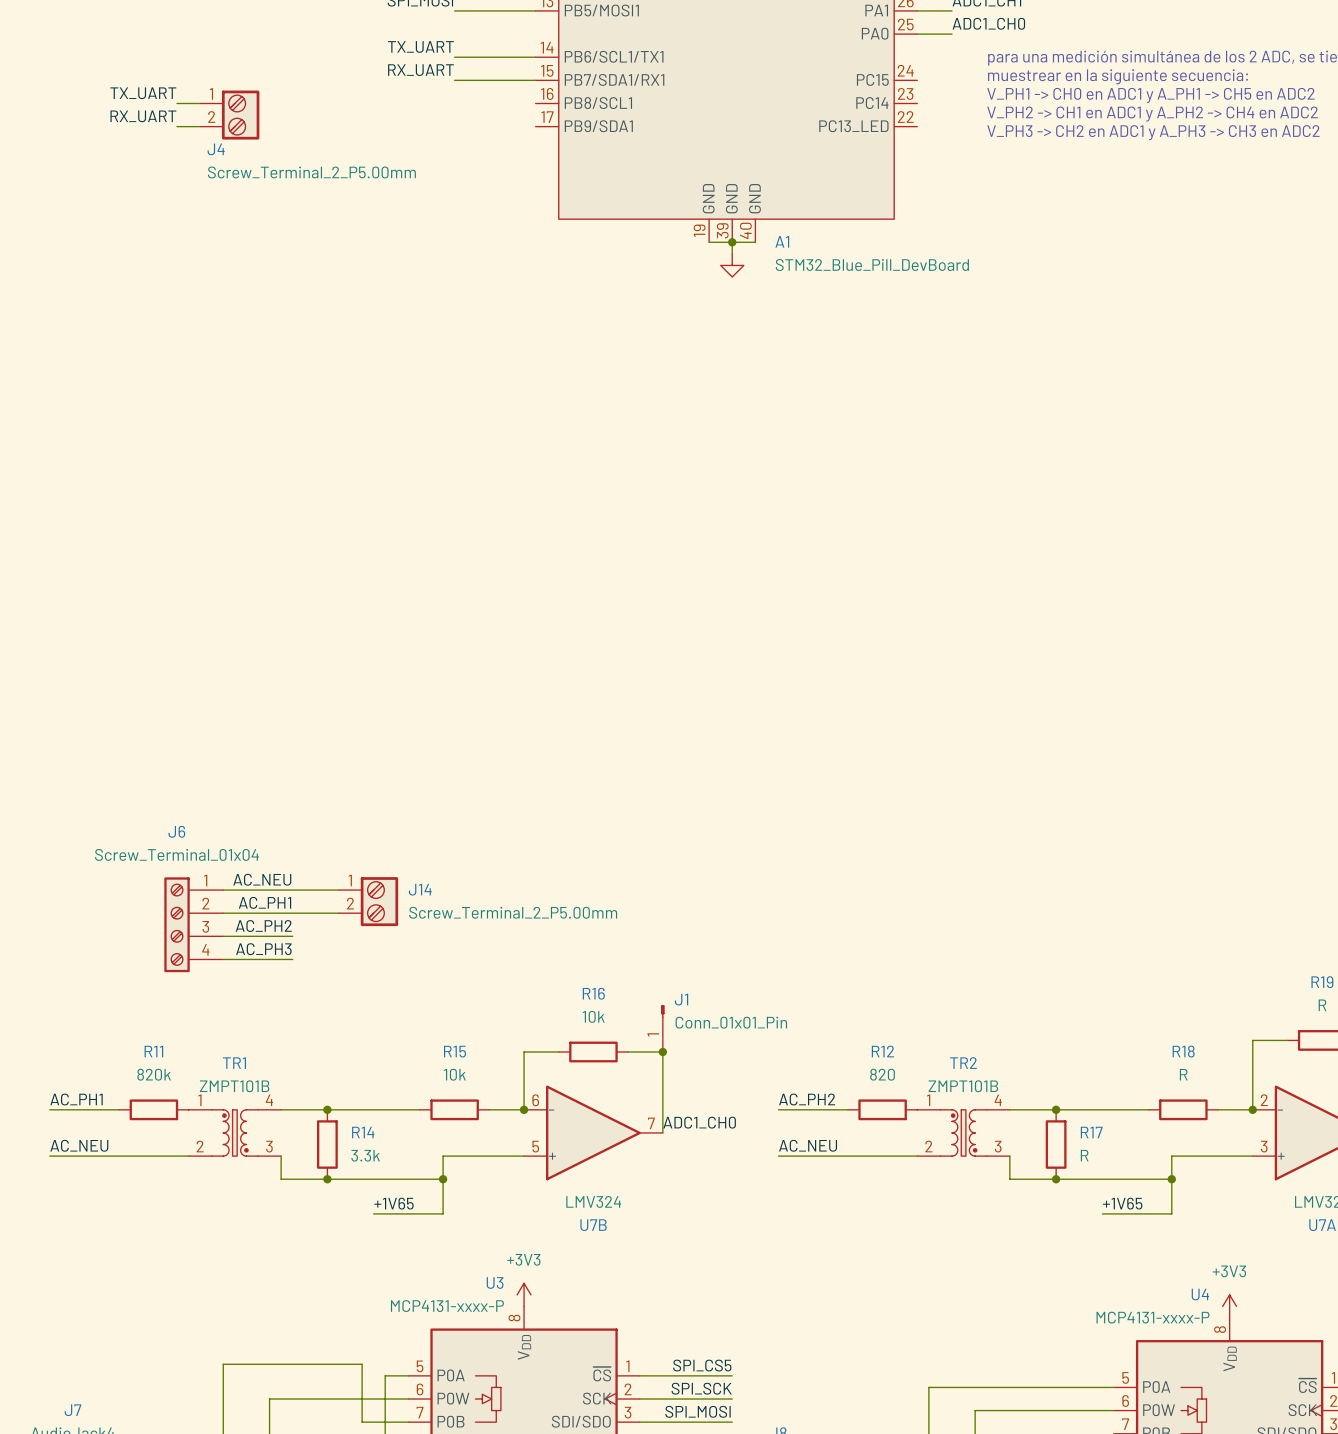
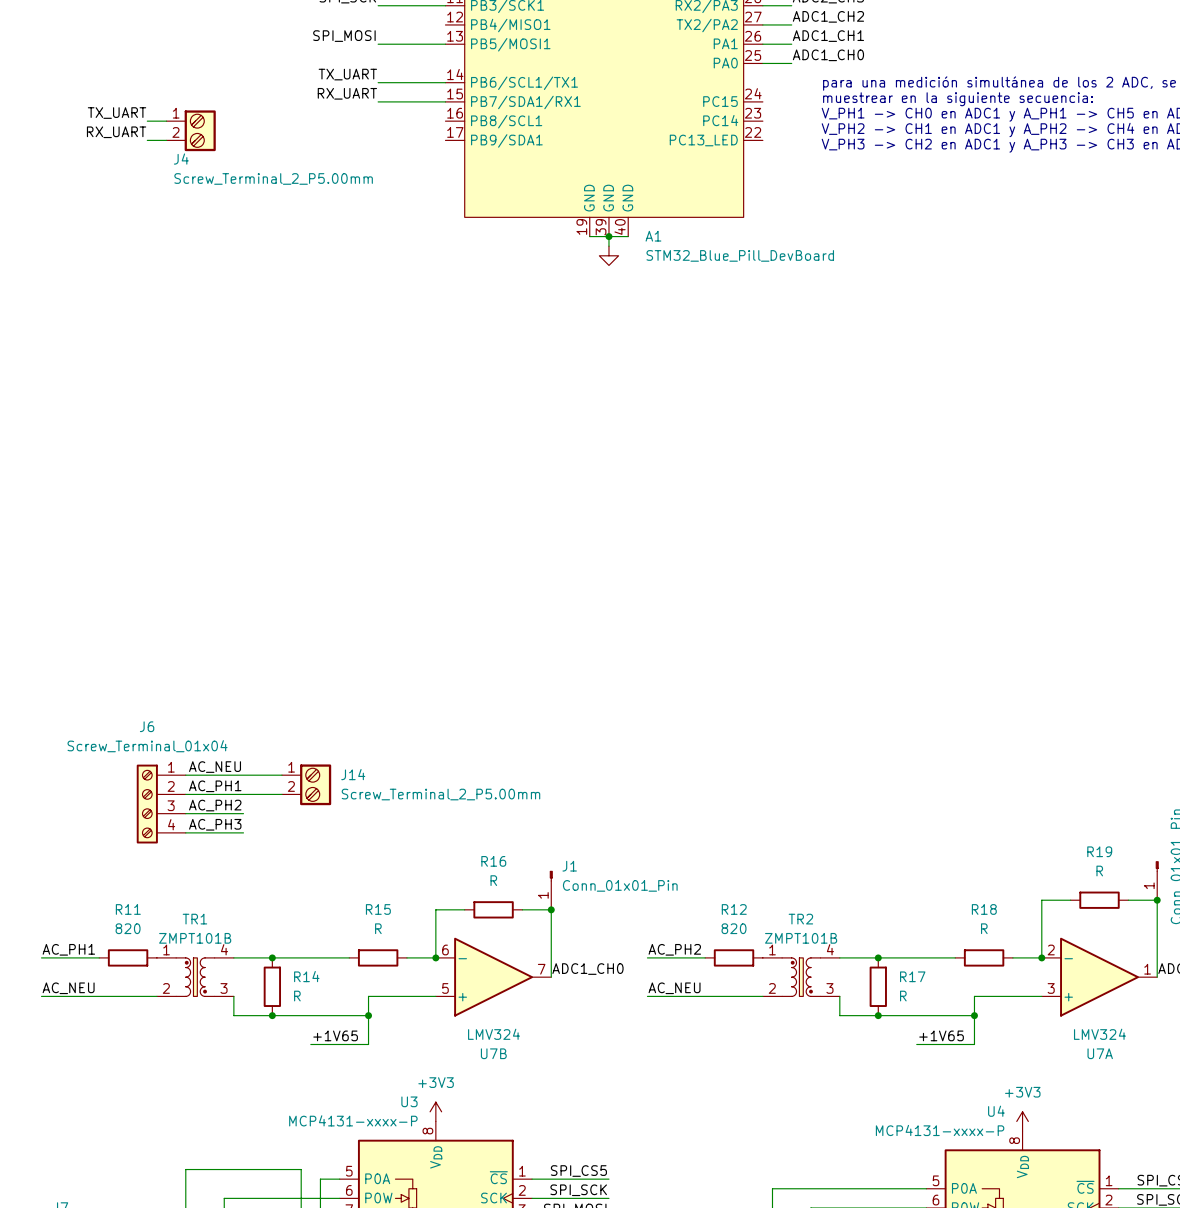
R16 value: 10k (593, 1016) -> R (493, 880)
R11 value: 820k (154, 1074) -> 820 (128, 928)
R15 value: 10k (454, 1074) -> R (378, 928)
R14 value: 3.3k (365, 1155) -> R (297, 996)

